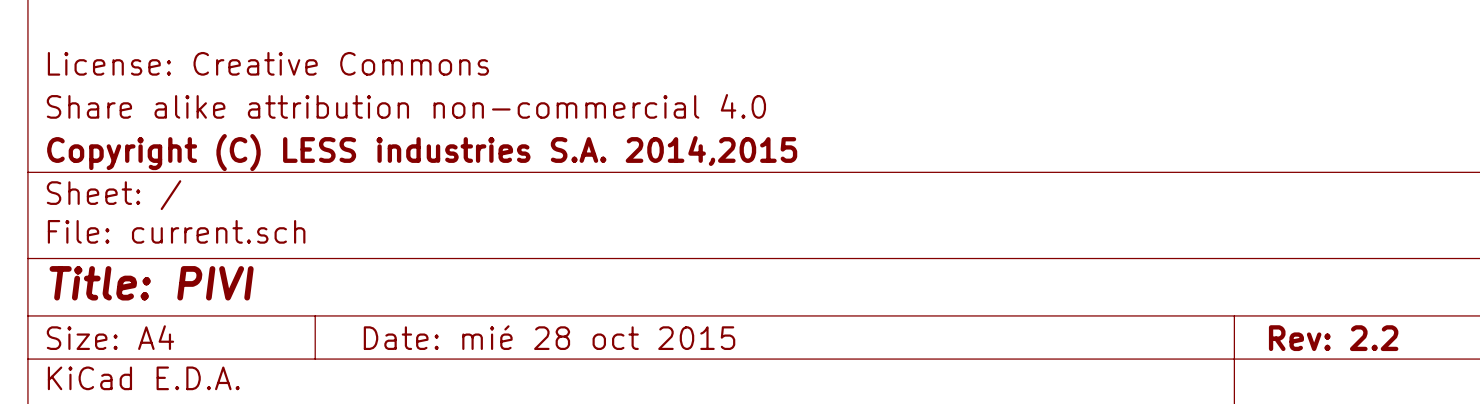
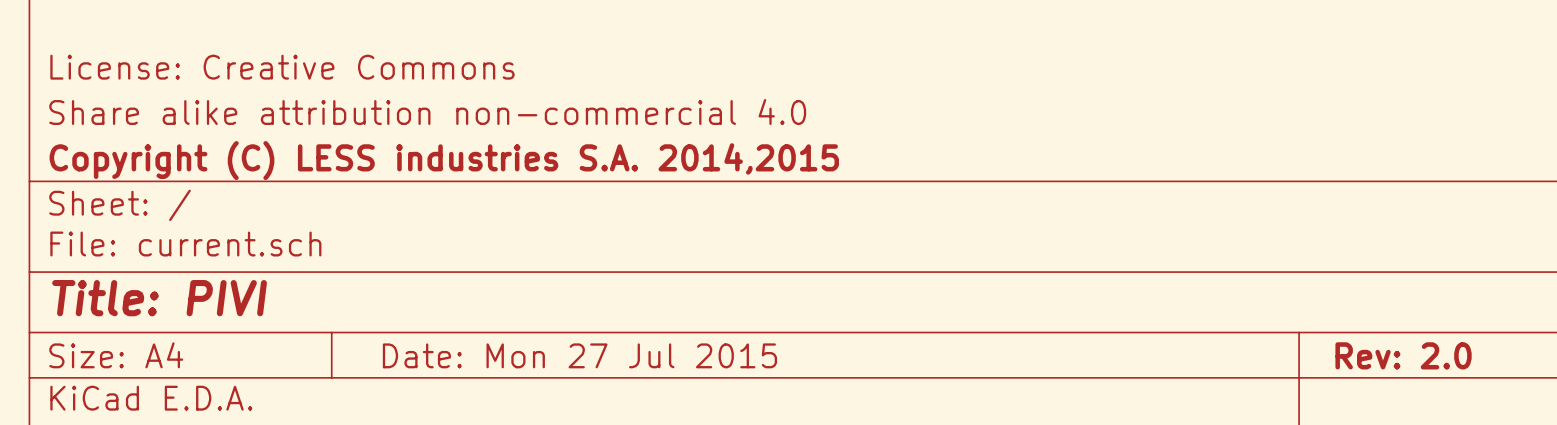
title block: Date: mié 28 oct 2015 (549, 337) -> Date: Mon 27 Jul 2015 (579, 355)
title block: Rev: 2.2 (1333, 338) -> Rev: 2.0 (1403, 355)

